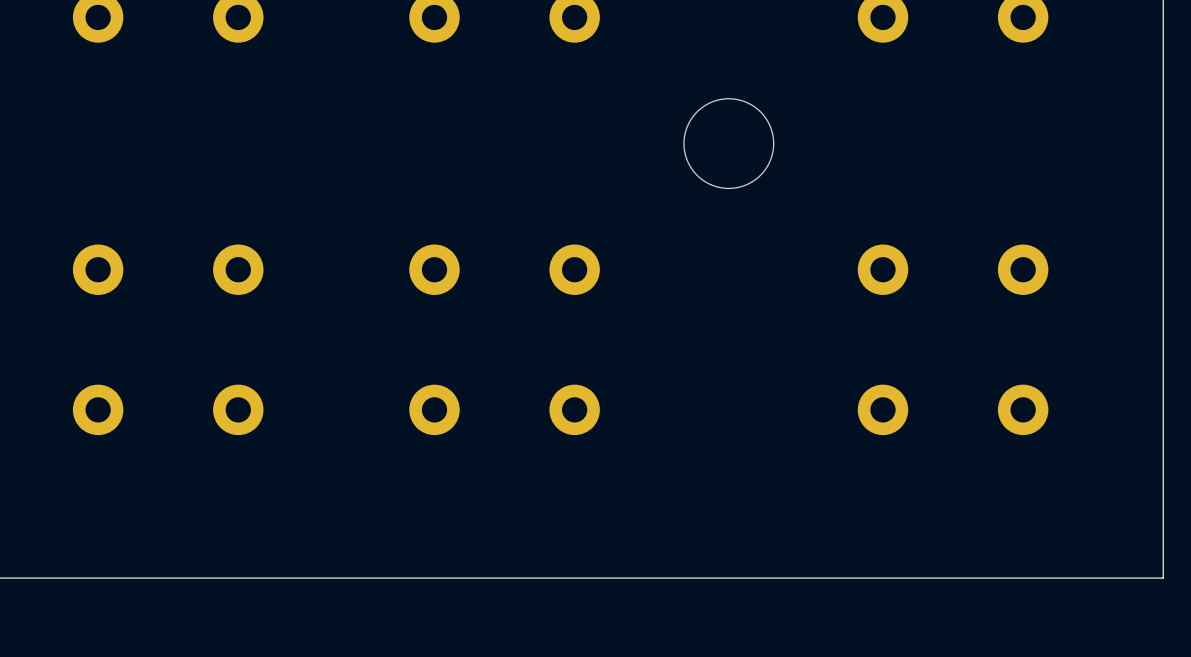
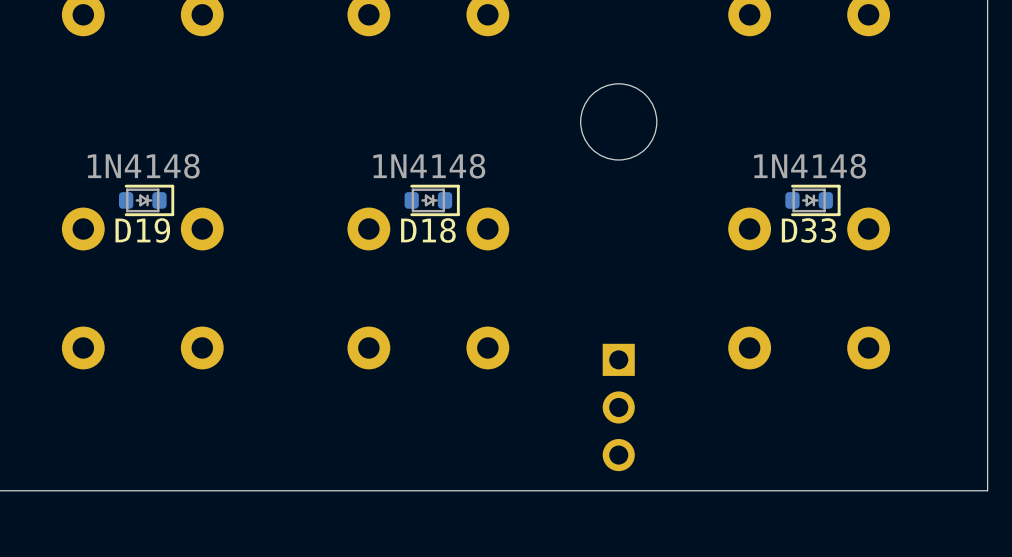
D19: none -> 1N4148 (146, 200)
D18: none -> 1N4148 (432, 200)
D33: none -> 1N4148 (812, 200)
part: none -> (618, 407)

